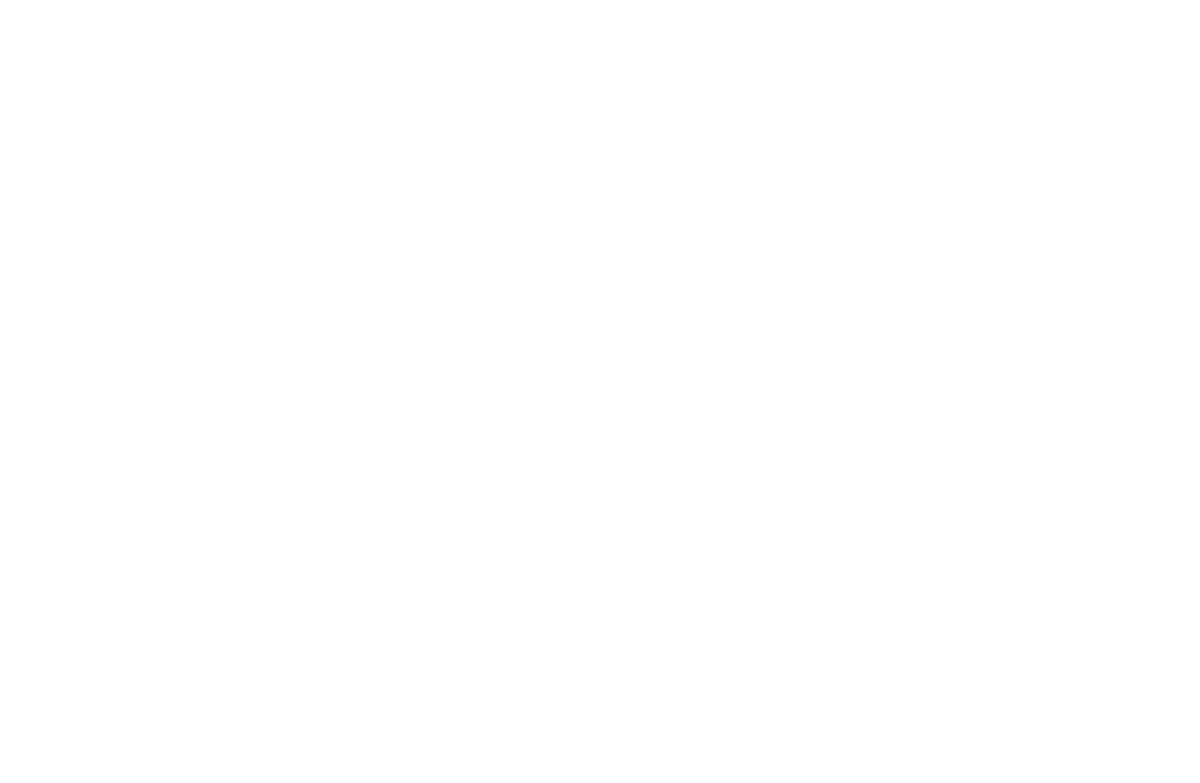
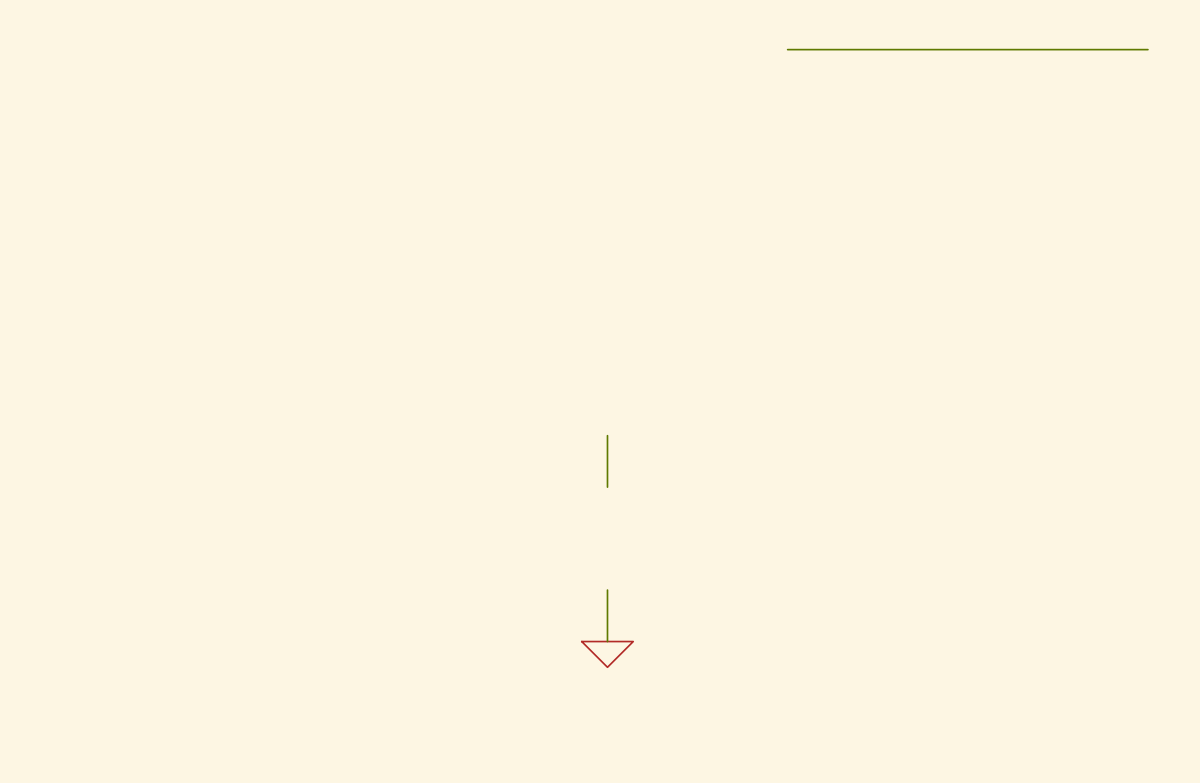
wire: none -> (787, 49) (1147, 49)
wire: none -> (607, 435) (607, 487)
wire: none -> (607, 590) (607, 641)
power symbol: none -> (607, 654)

